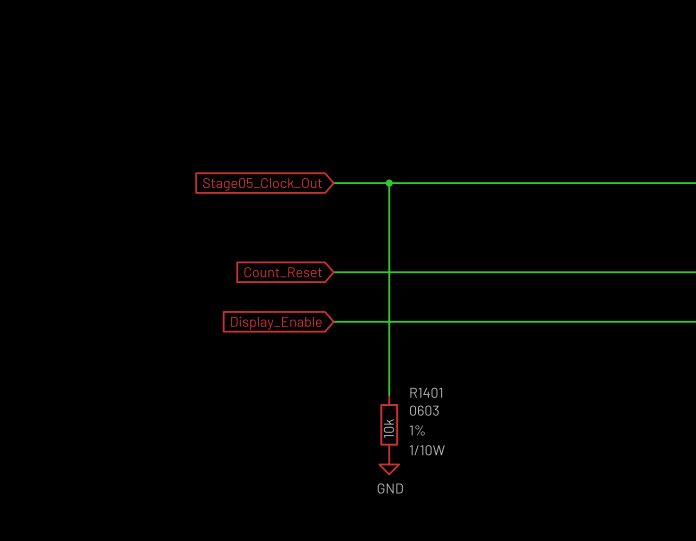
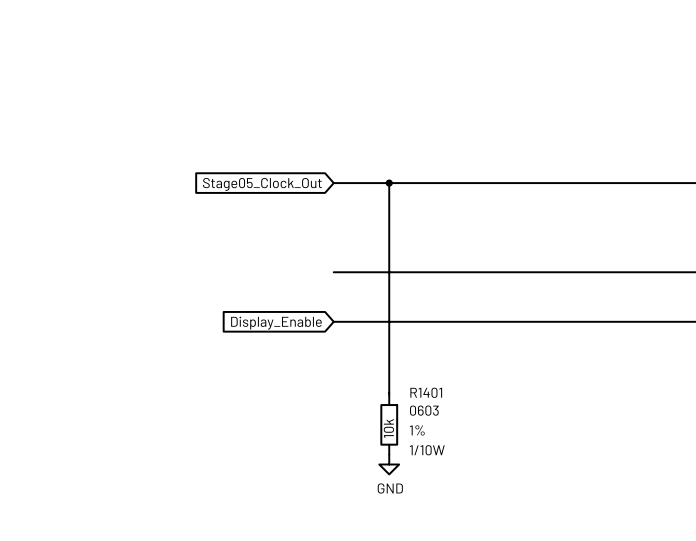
global label: Count_Reset (283, 272) -> none

